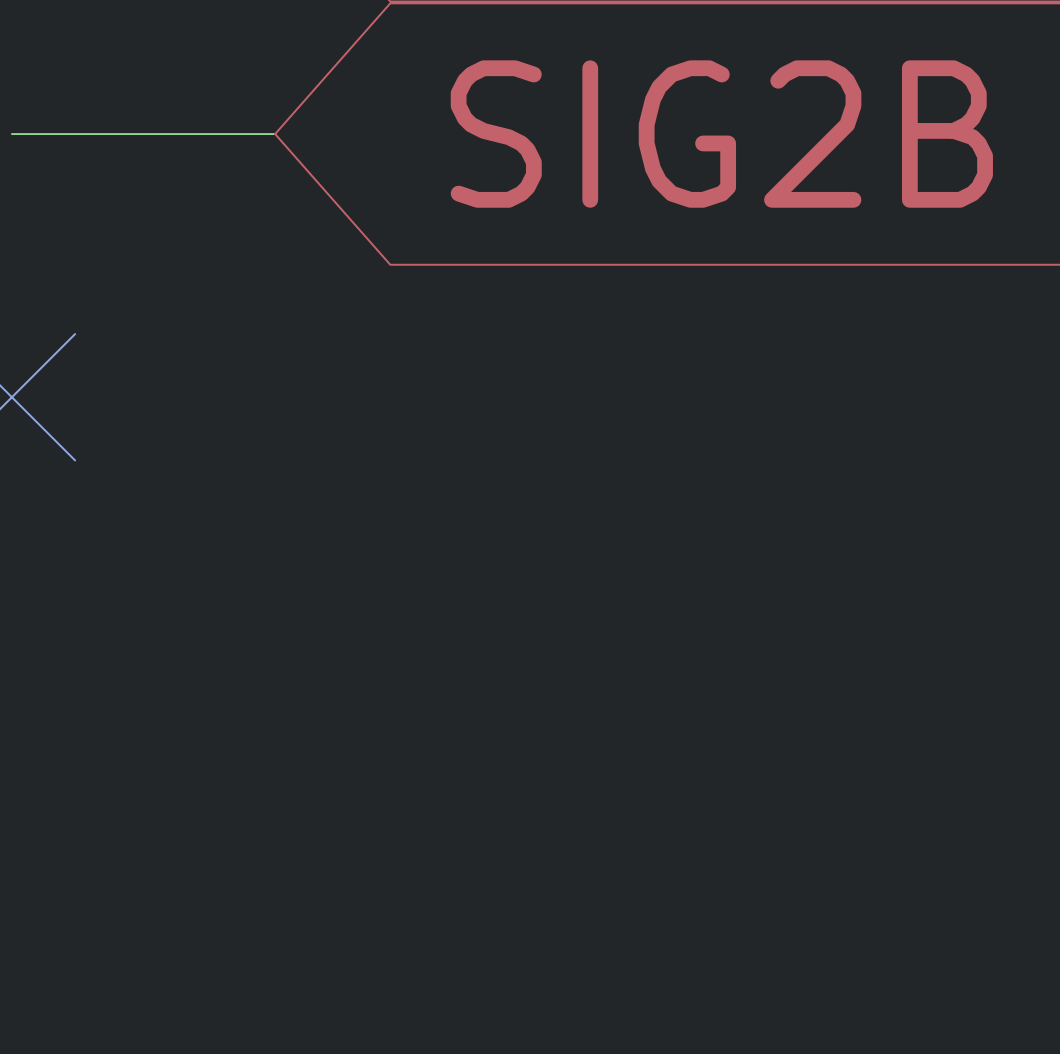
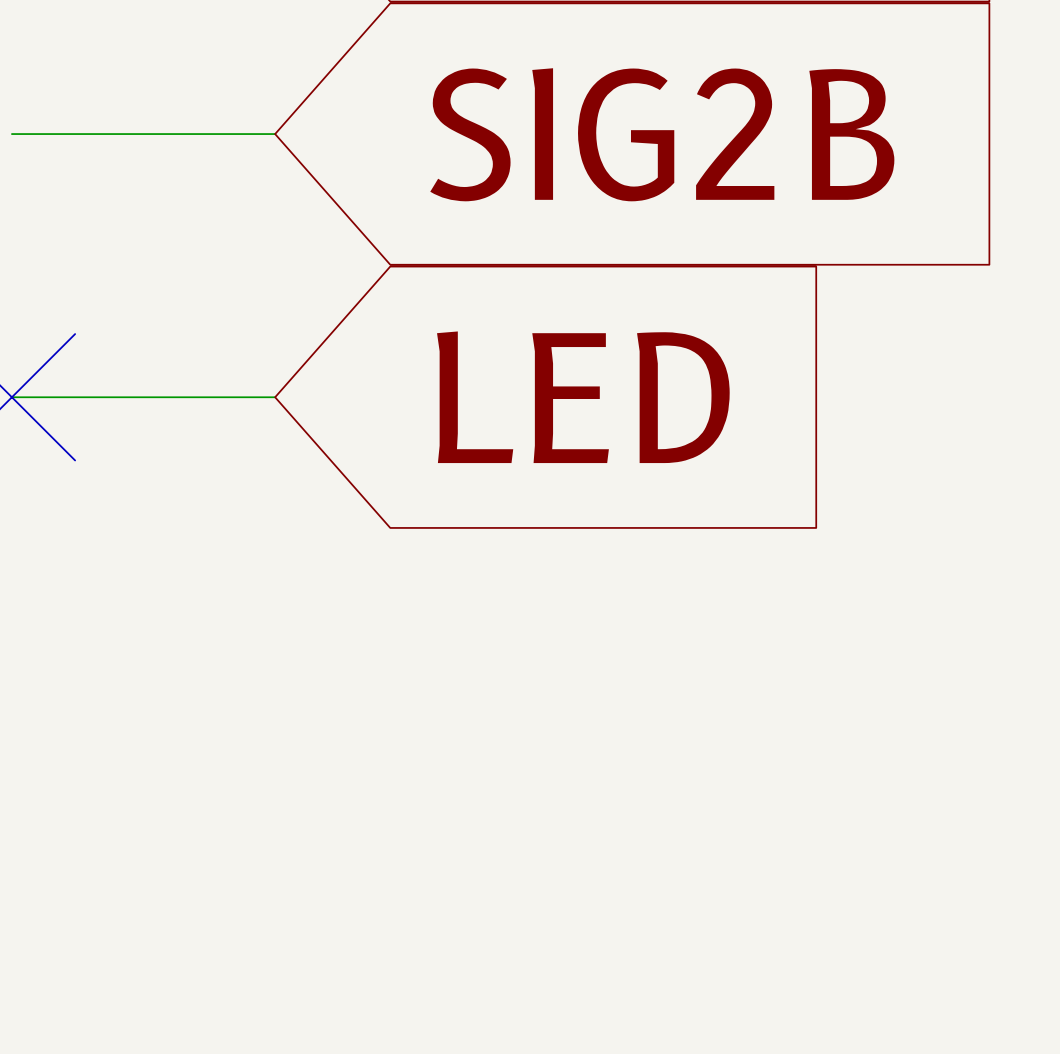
wire: none -> (11, 397) (275, 397)
global label: none -> LED (583, 397)

